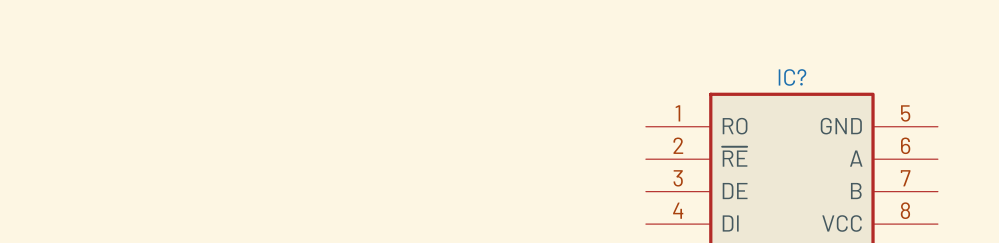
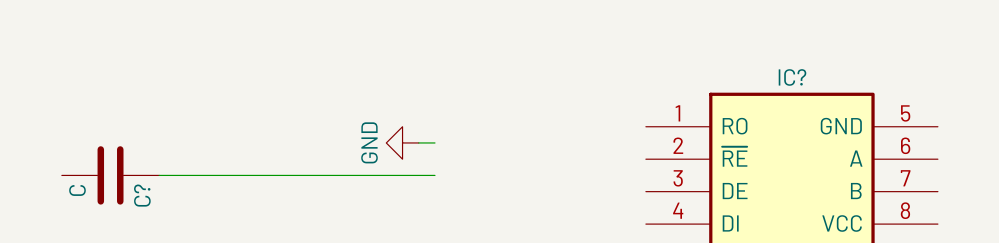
power symbol: none -> GND (402, 142)
wire: none -> (418, 142) (434, 142)
C?: none -> C (110, 175)
wire: none -> (159, 175) (434, 175)

